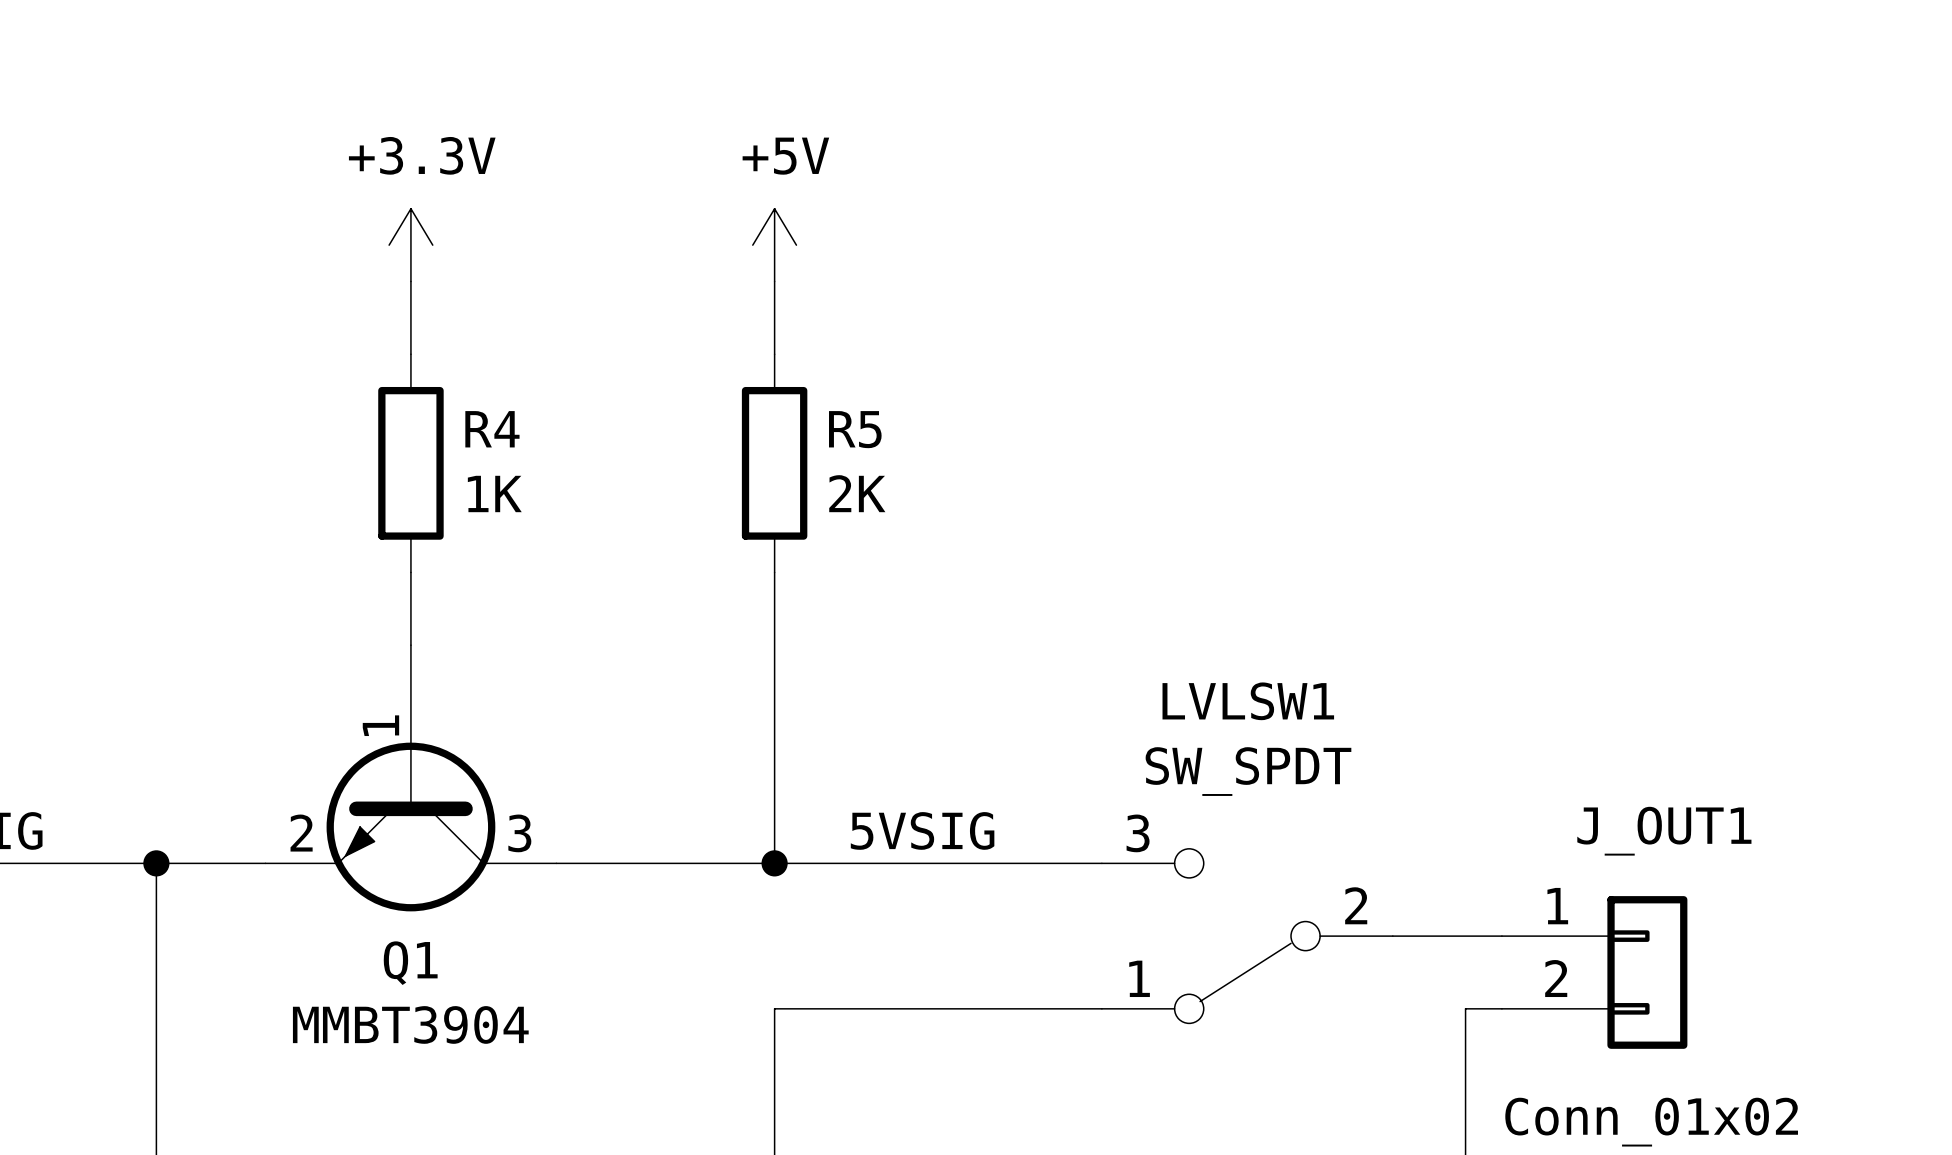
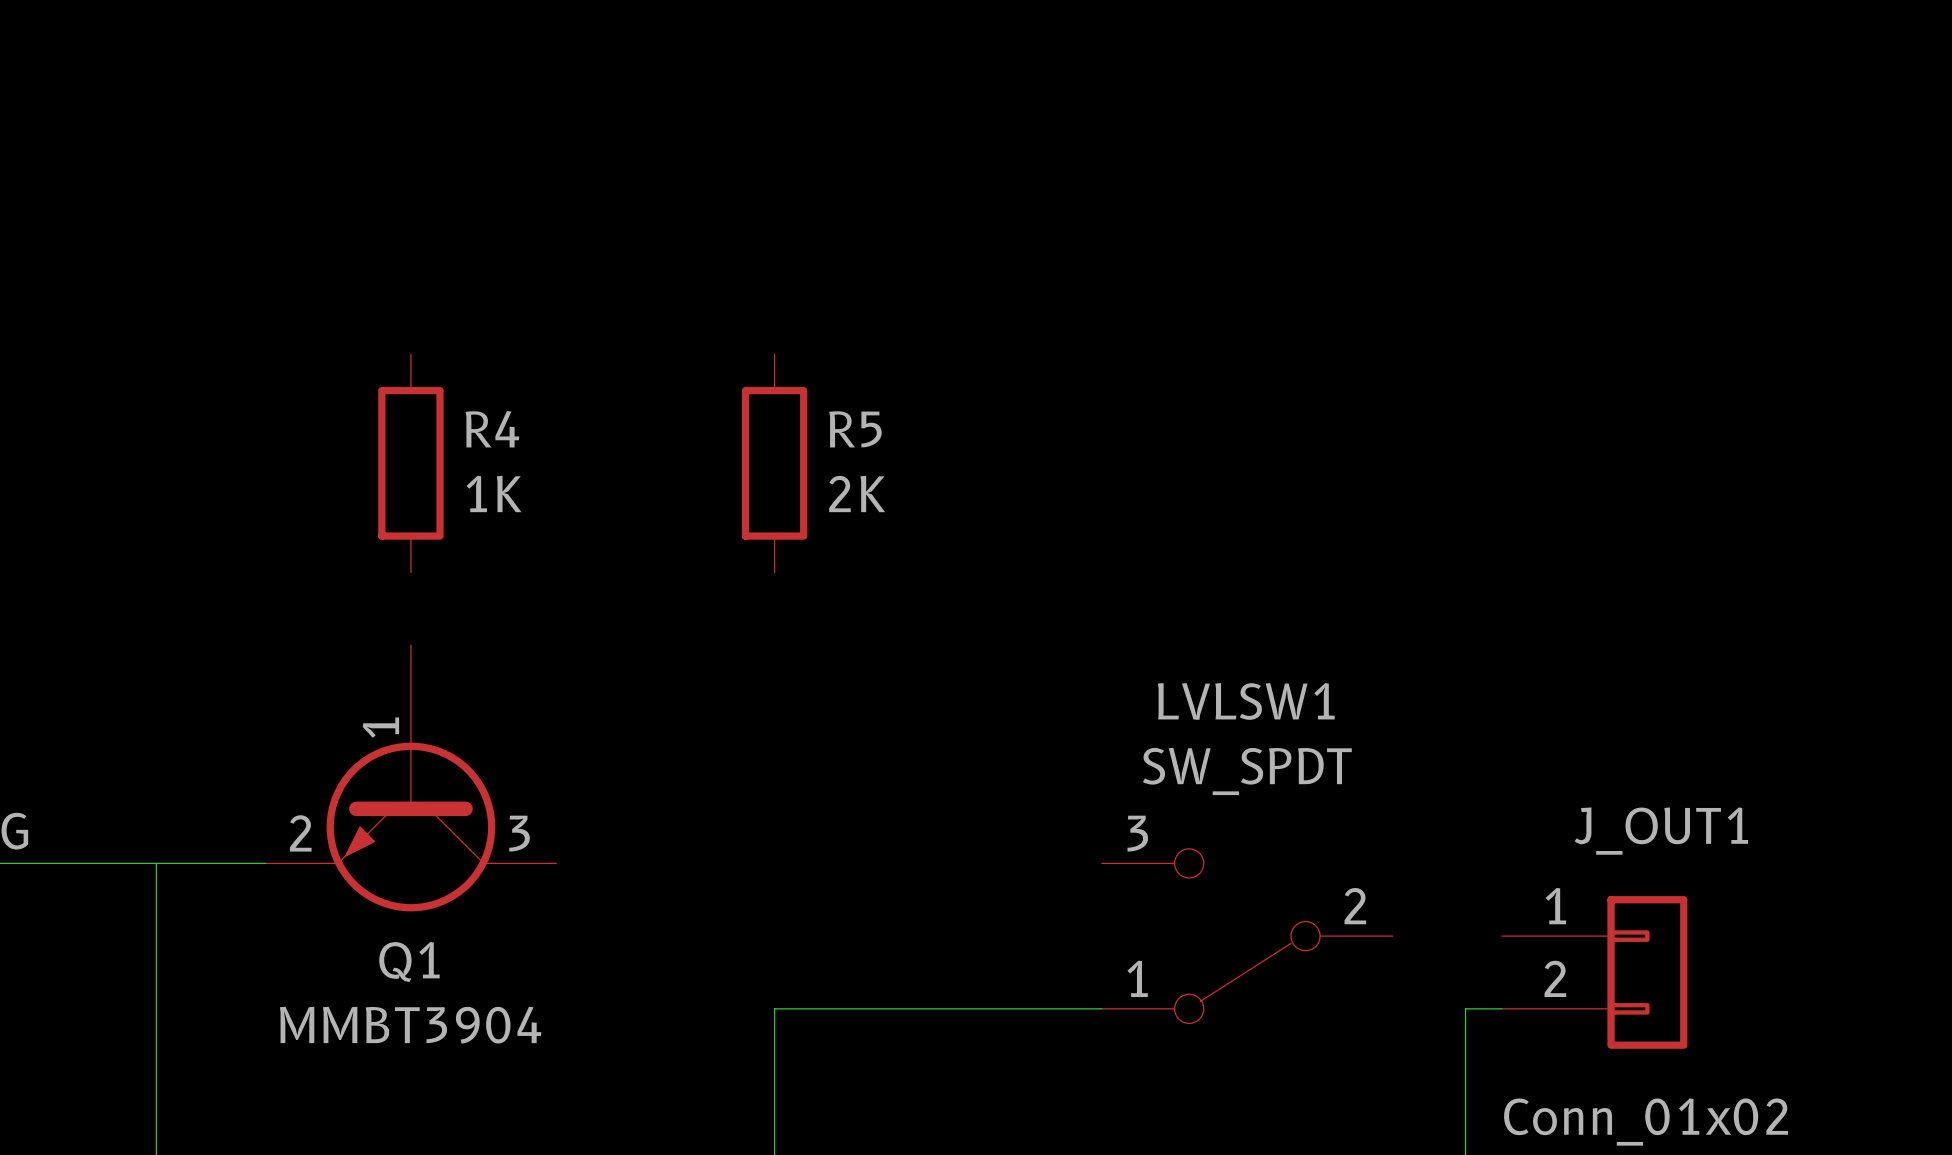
power symbol: +3.3V (410, 245) -> none
power symbol: +5V (774, 245) -> none
wire: (410, 281) (410, 354) -> none
wire: (774, 281) (774, 354) -> none
wire: (410, 572) (410, 645) -> none
wire: (774, 572) (774, 863) -> none
label: 5VSIG (922, 830) -> none
junction: (156, 863) -> none
wire: (556, 863) (1101, 863) -> none
junction: (774, 863) -> none
wire: (1392, 936) (1501, 936) -> none

